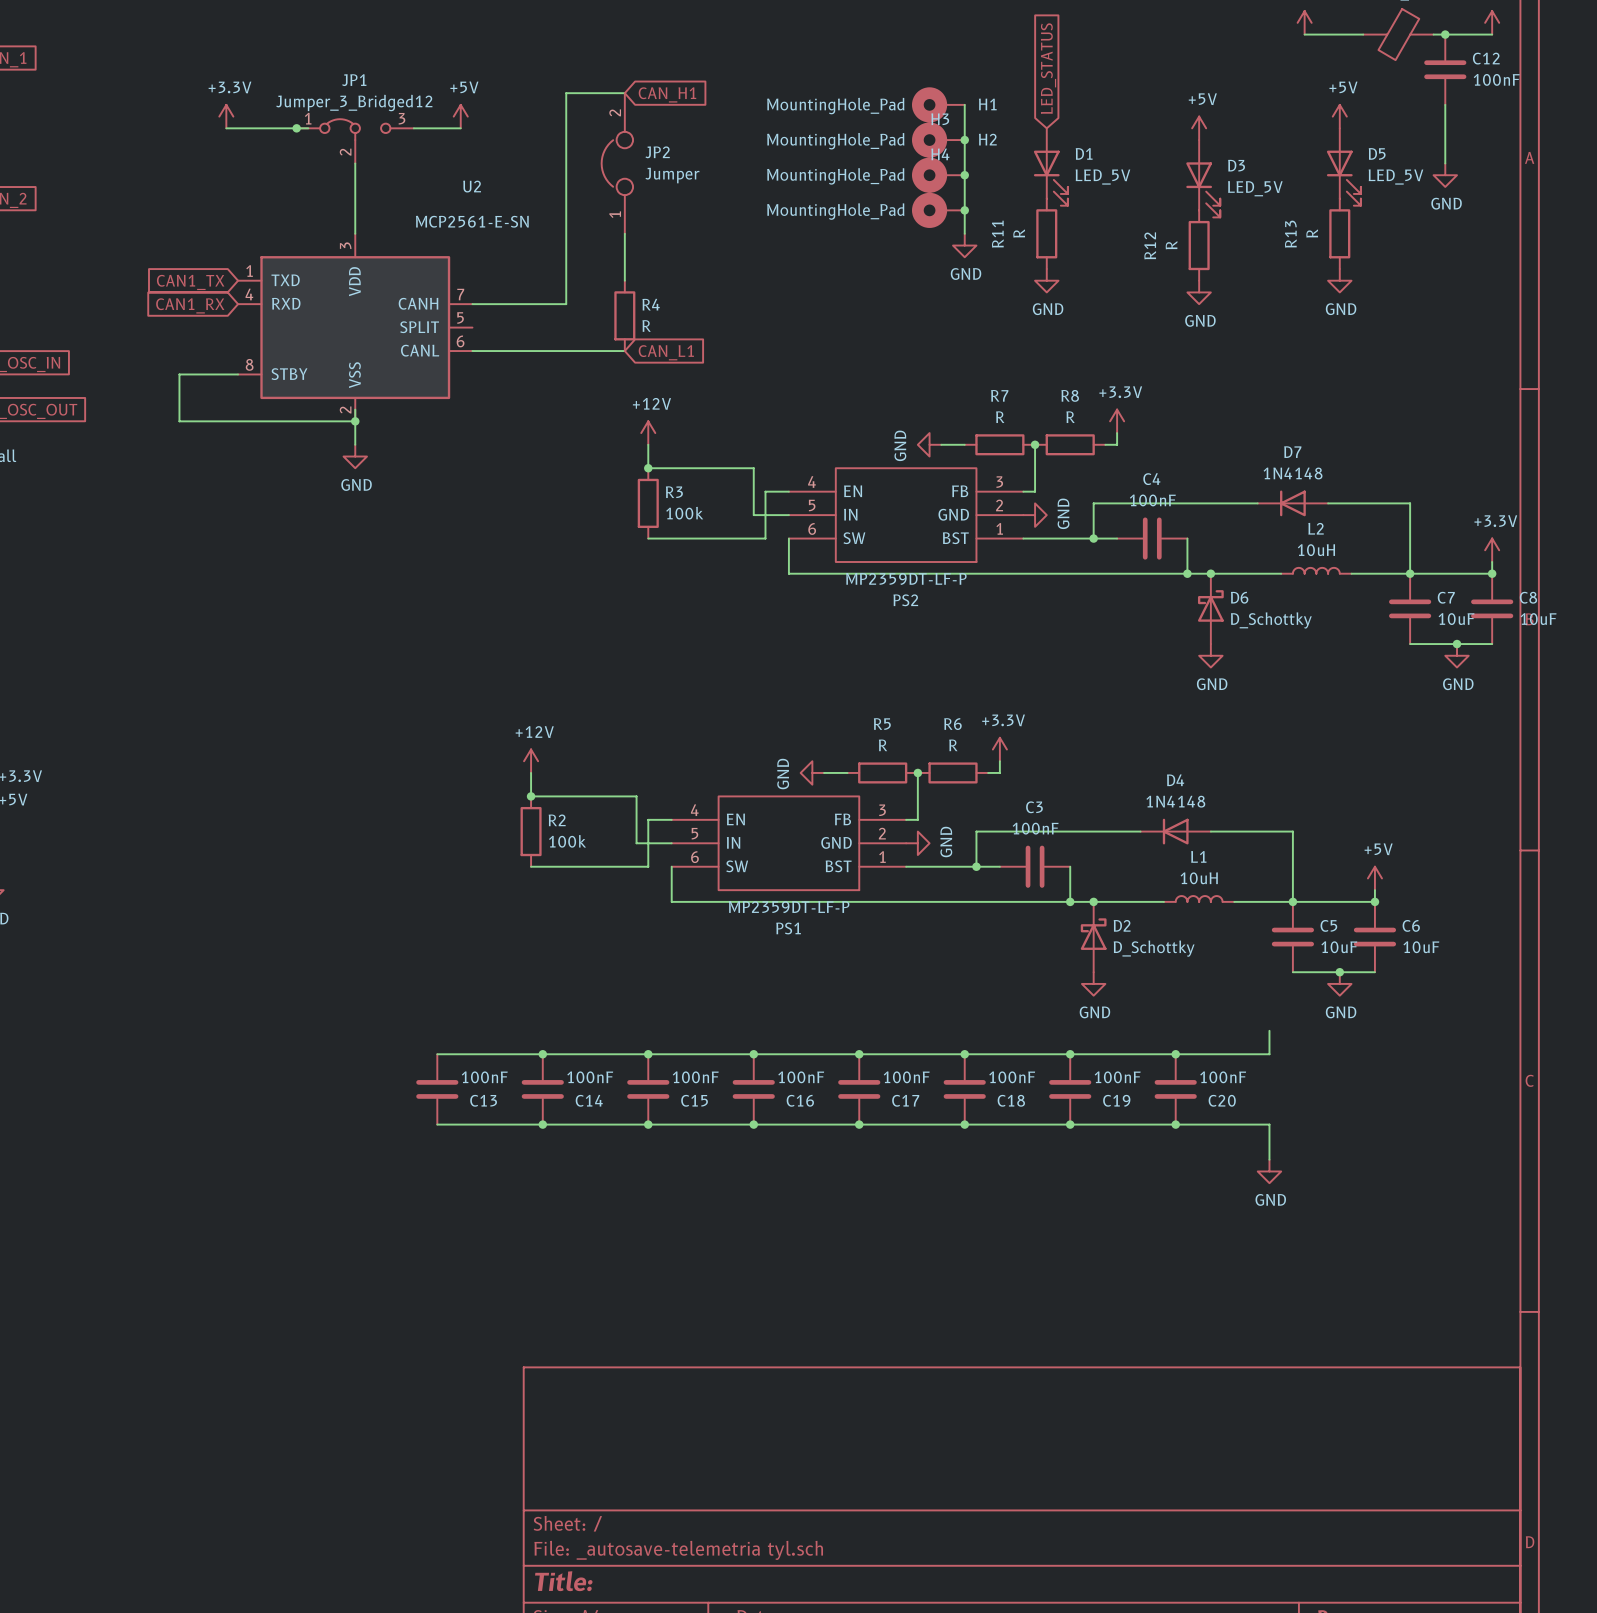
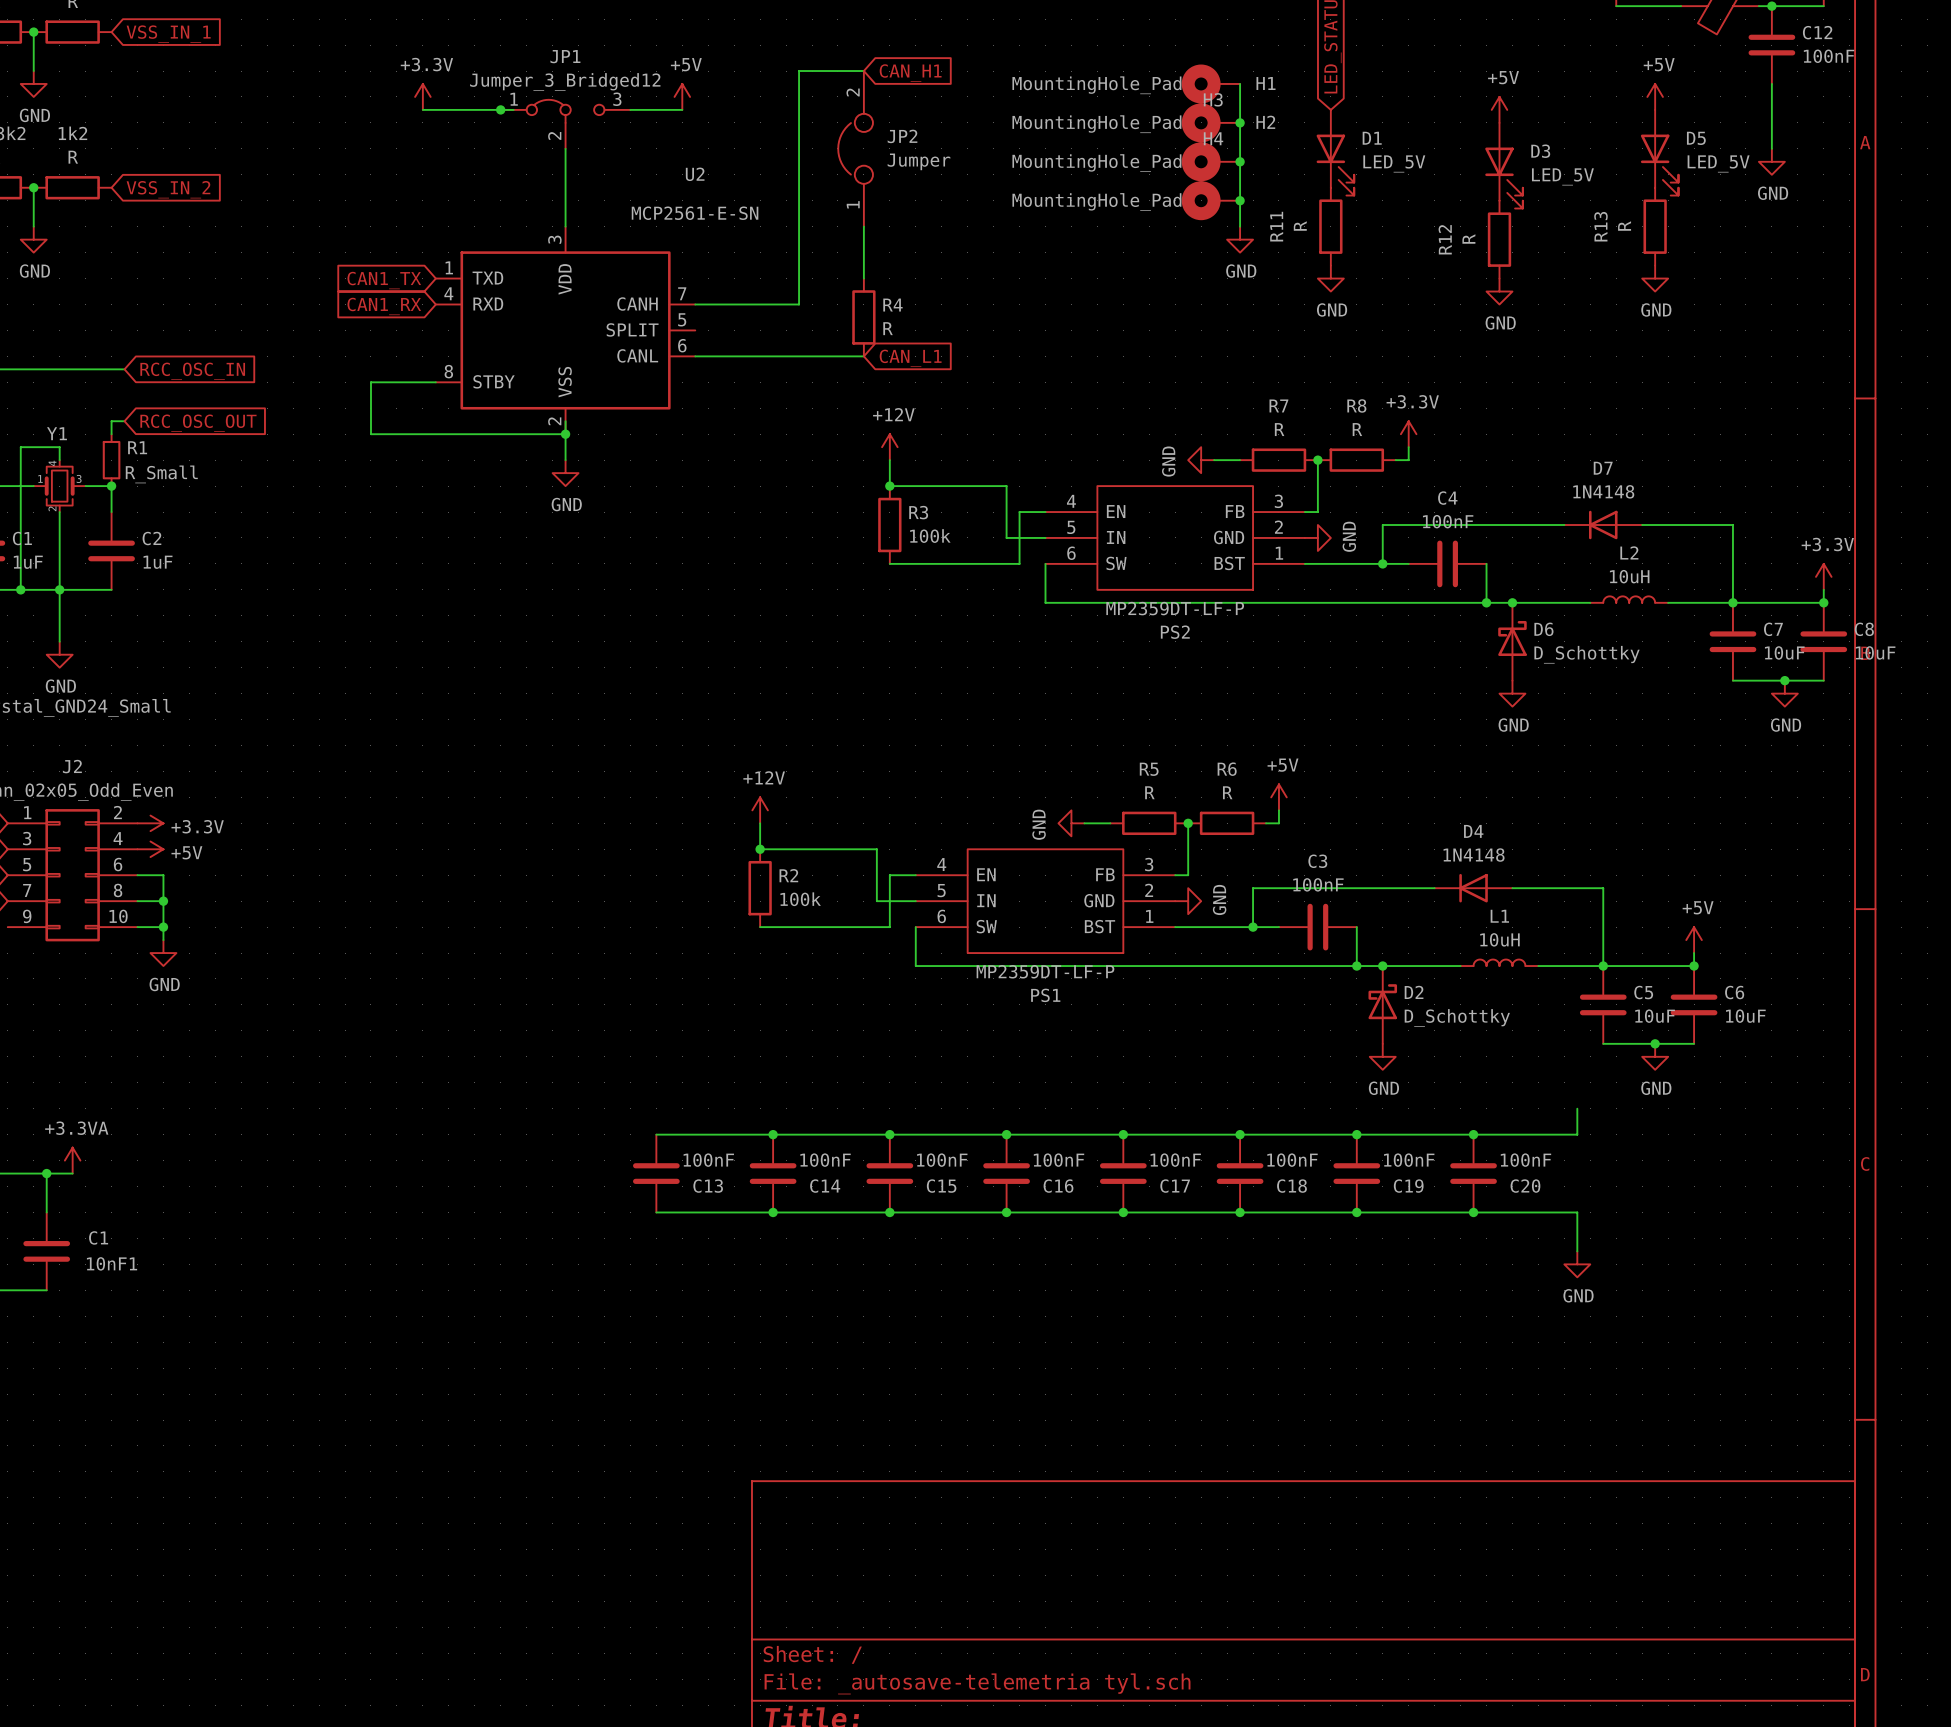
power symbol: +3.3V (999, 749) -> +5V (1278, 797)

